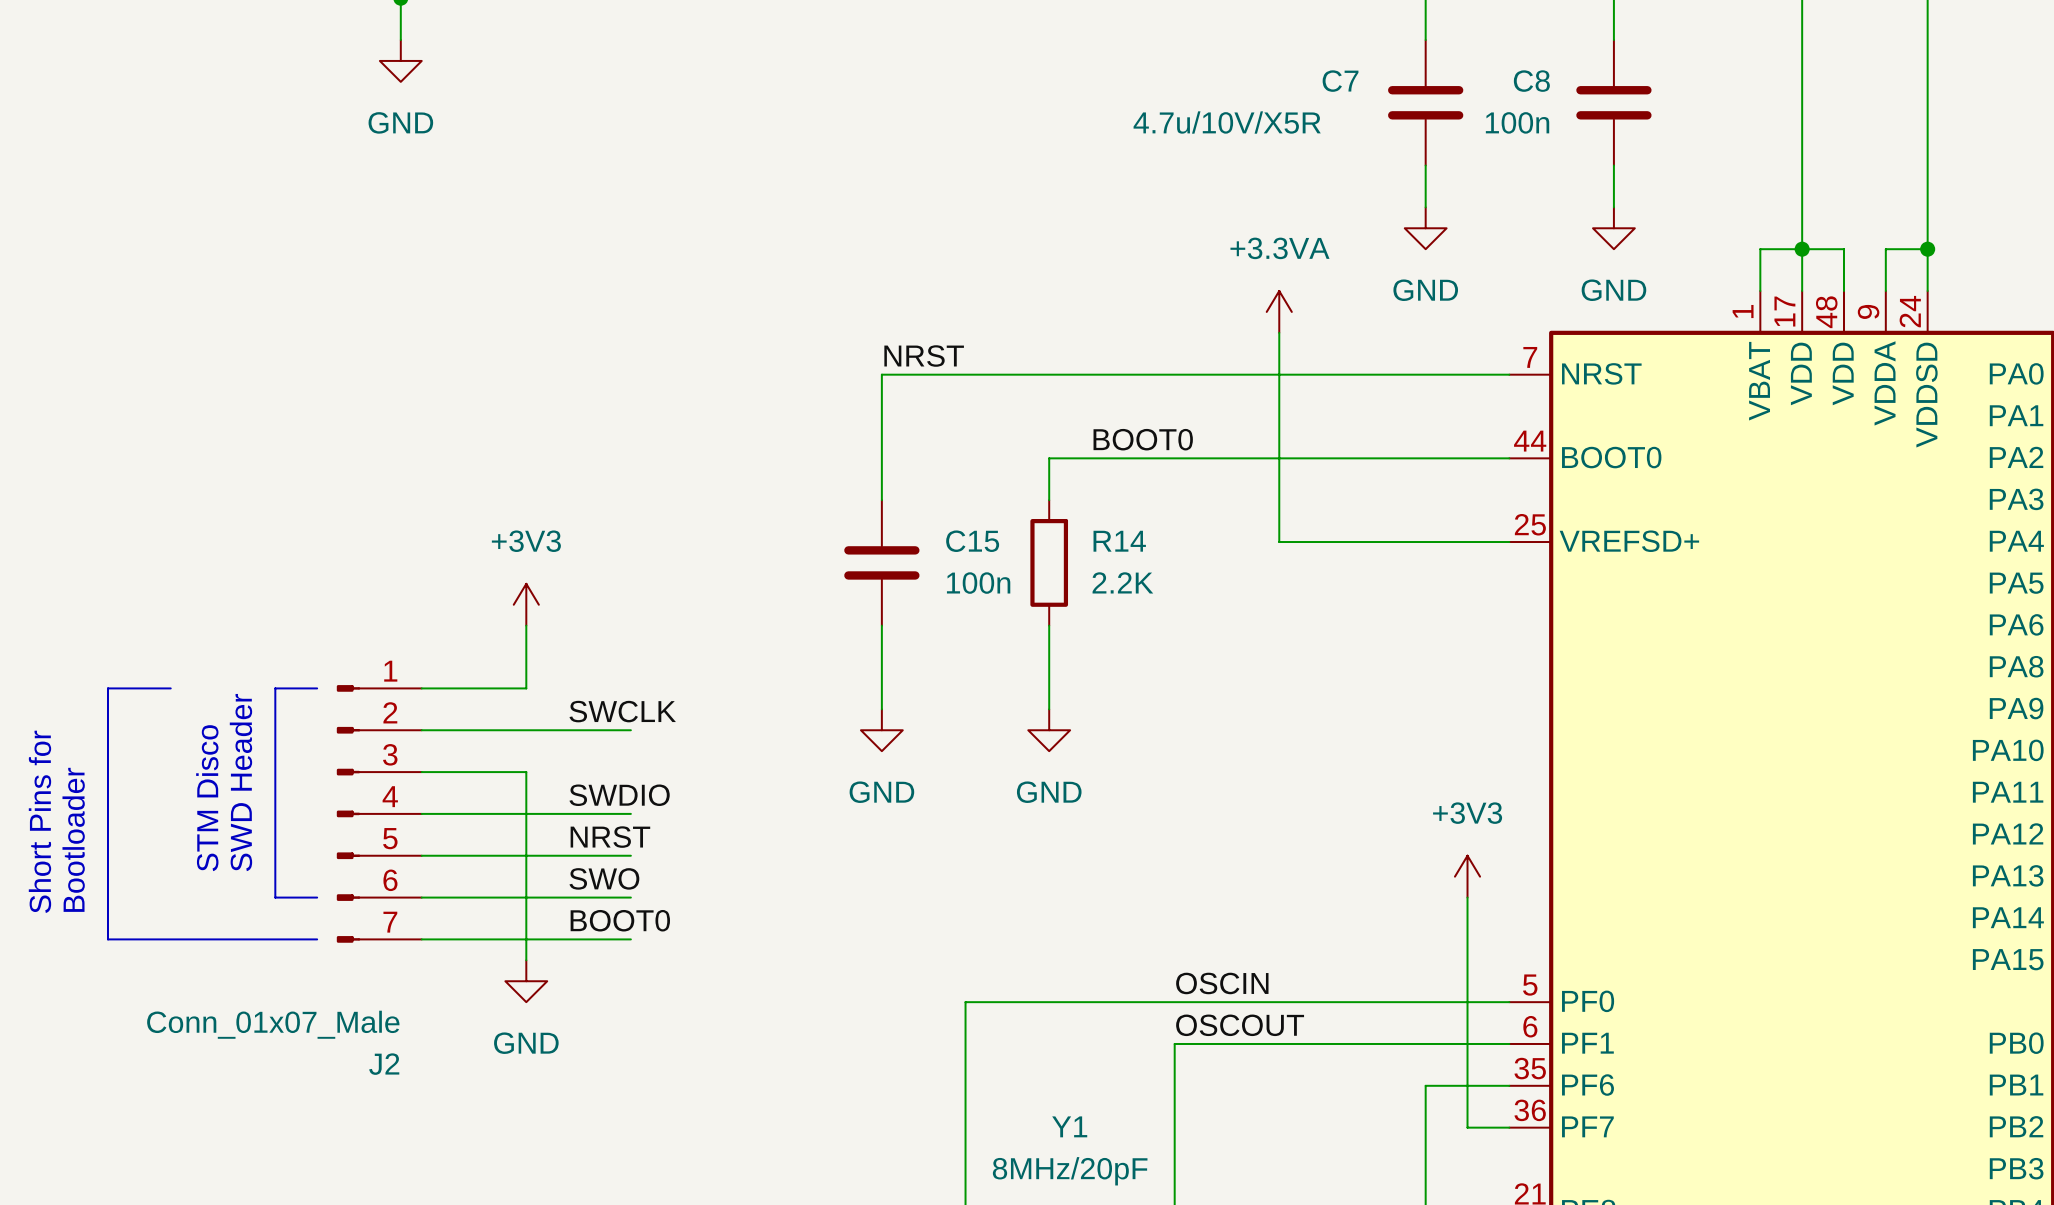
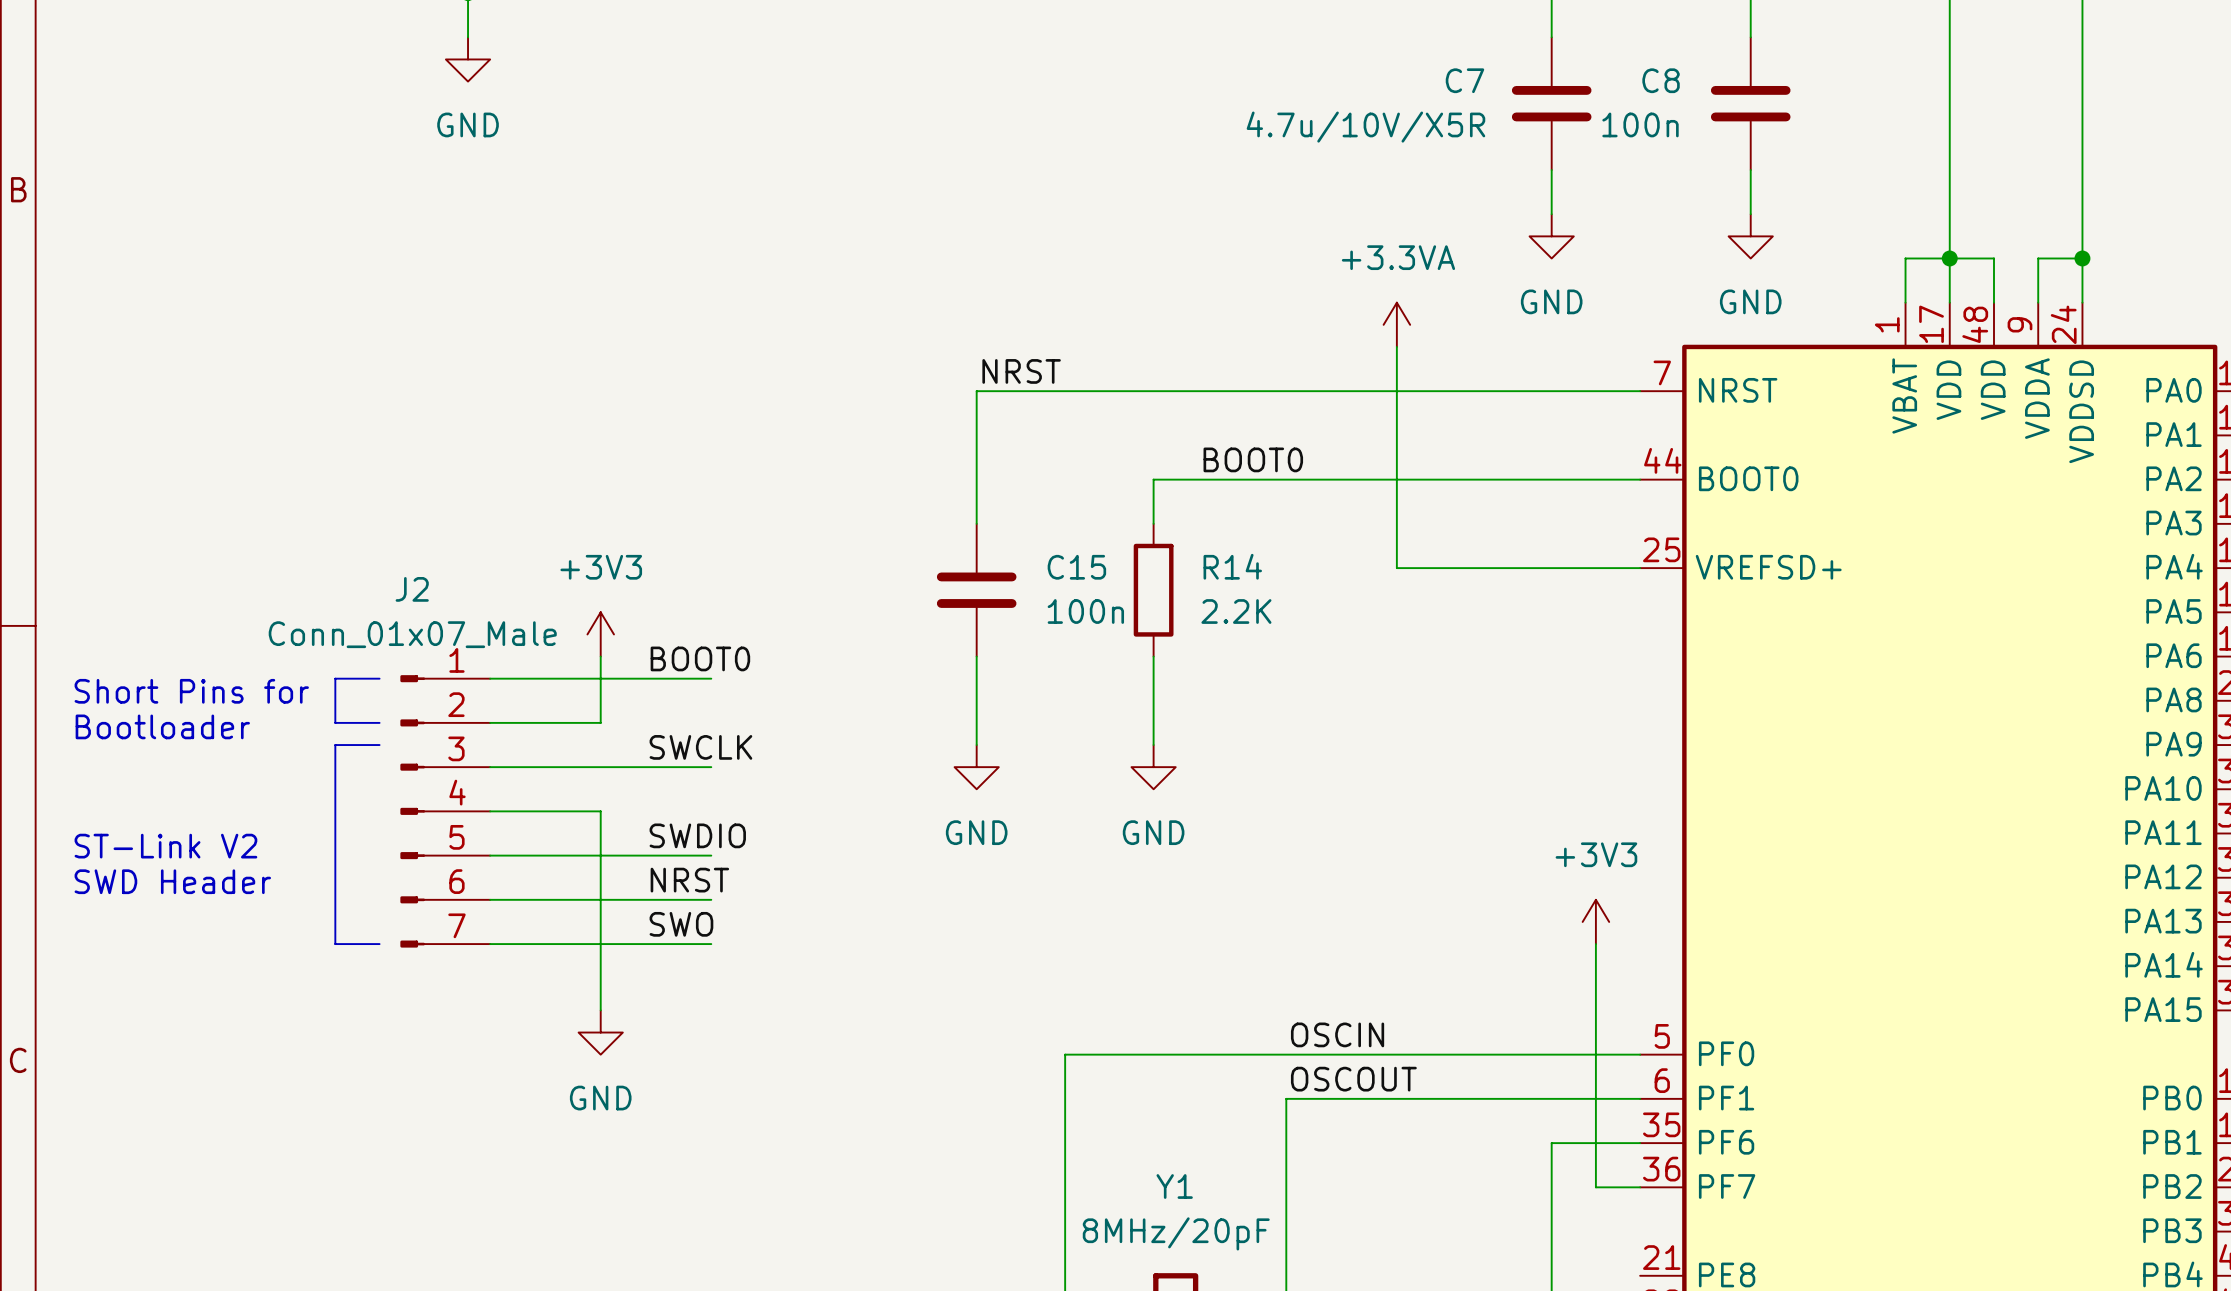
line: none -> (379, 678) (335, 678) (335, 722)
line: (170, 688) (107, 688) (107, 939) (317, 939) -> none
line: (275, 688) (275, 709) -> (379, 745) (335, 745)
text rotation: 0° (240, 782) -> 90° clockwise (172, 881)
text: STM Disco (207, 798) -> none
text: none -> ST-Link V2 (165, 846)
J2 position: (379, 813) -> (445, 811)
text rotation: 0° (39, 821) -> 90° clockwise (191, 691)
text rotation: 0° (73, 839) -> 90° clockwise (162, 726)
label position: BOOT0 (620, 920) -> BOOT0 (700, 658)
wire: (421, 939) (630, 939) -> (490, 678) (711, 678)
J2 value position: Conn_01x07_Male (273, 1024) -> Conn_01x07_Male (412, 634)
J2 name position: J2 (384, 1064) -> J2 (412, 589)

